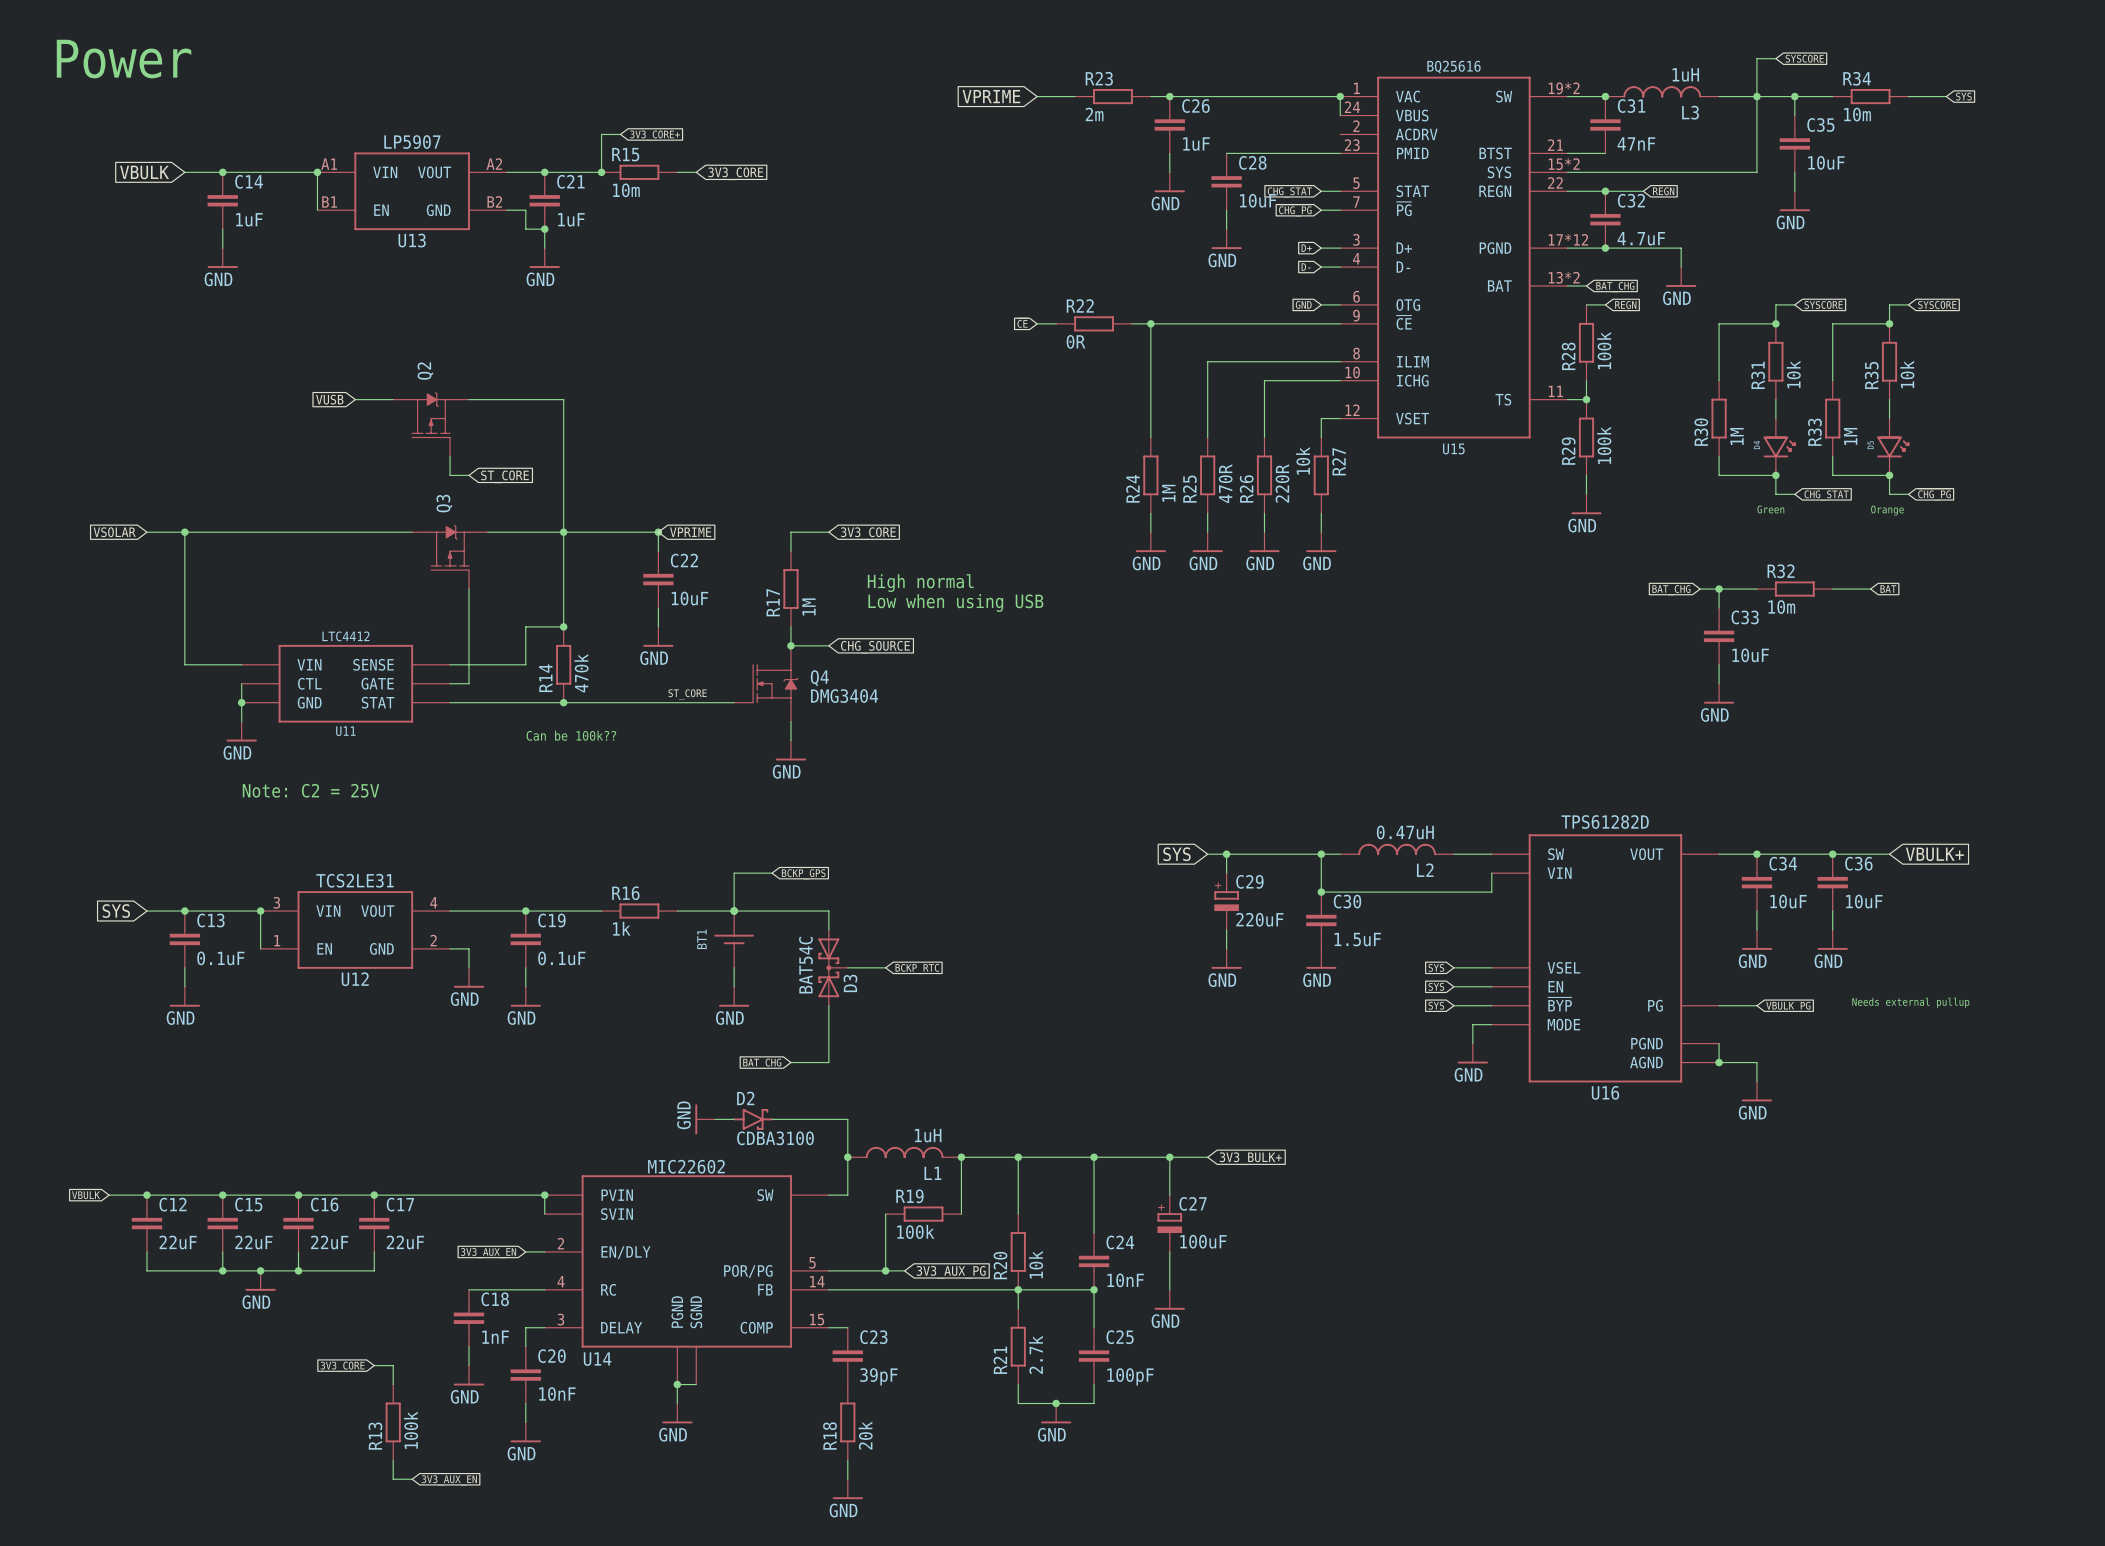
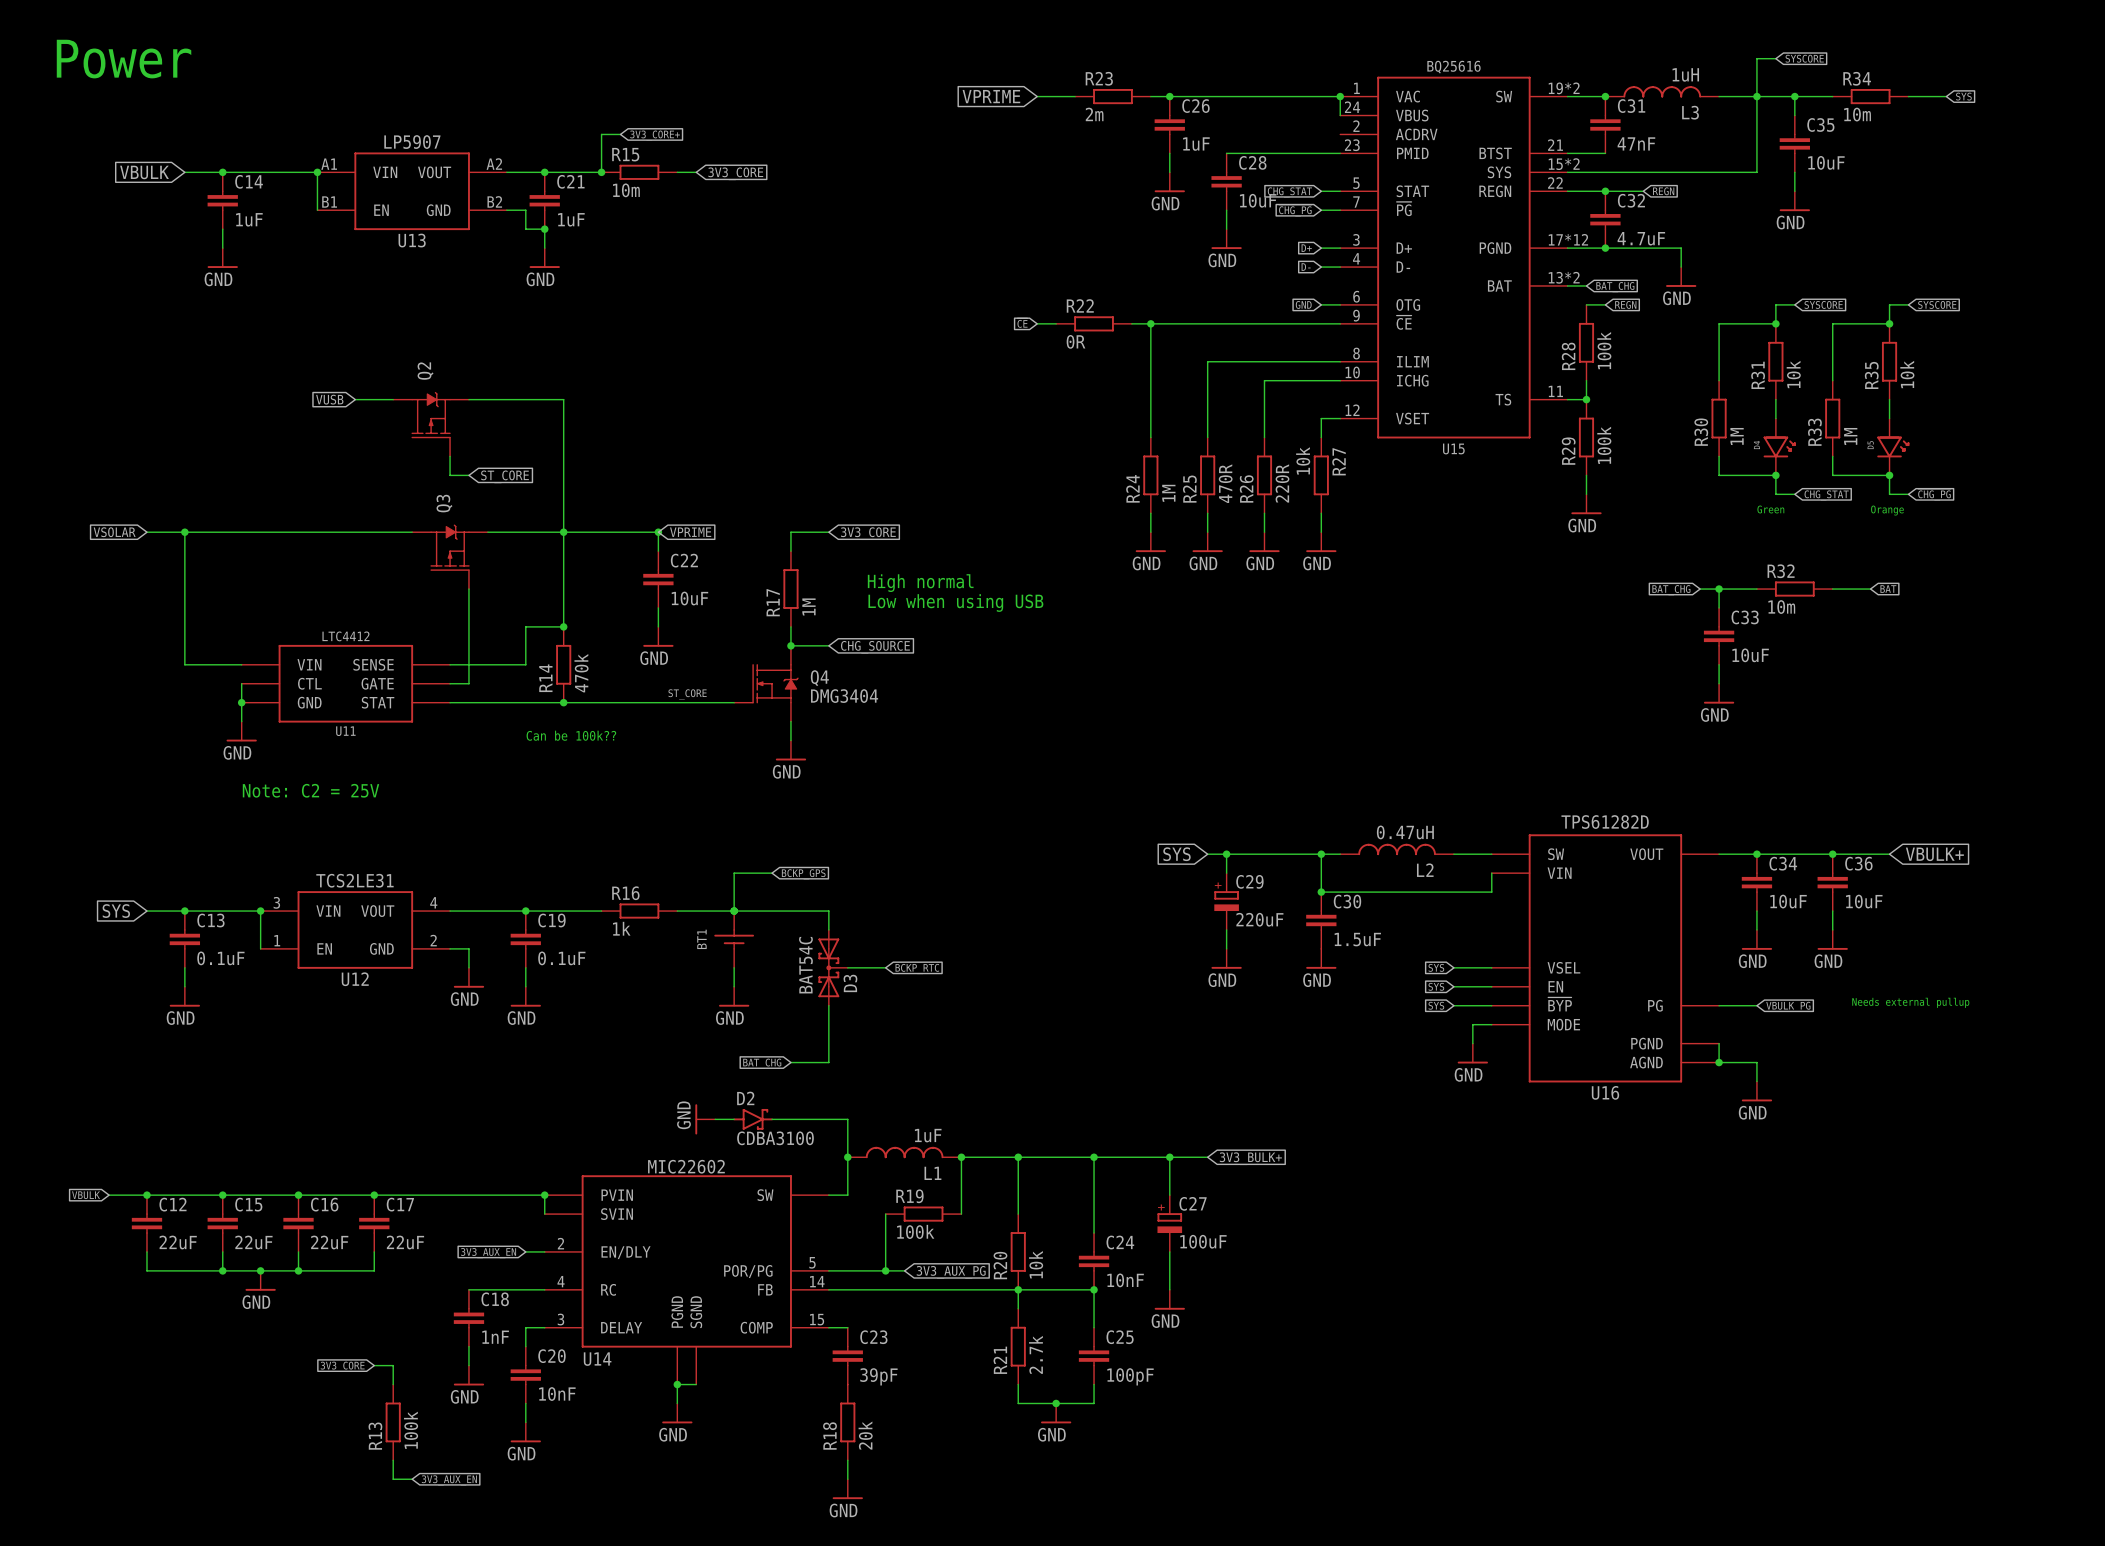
L1 value: 1uH (928, 1135) -> 1uF (928, 1135)

